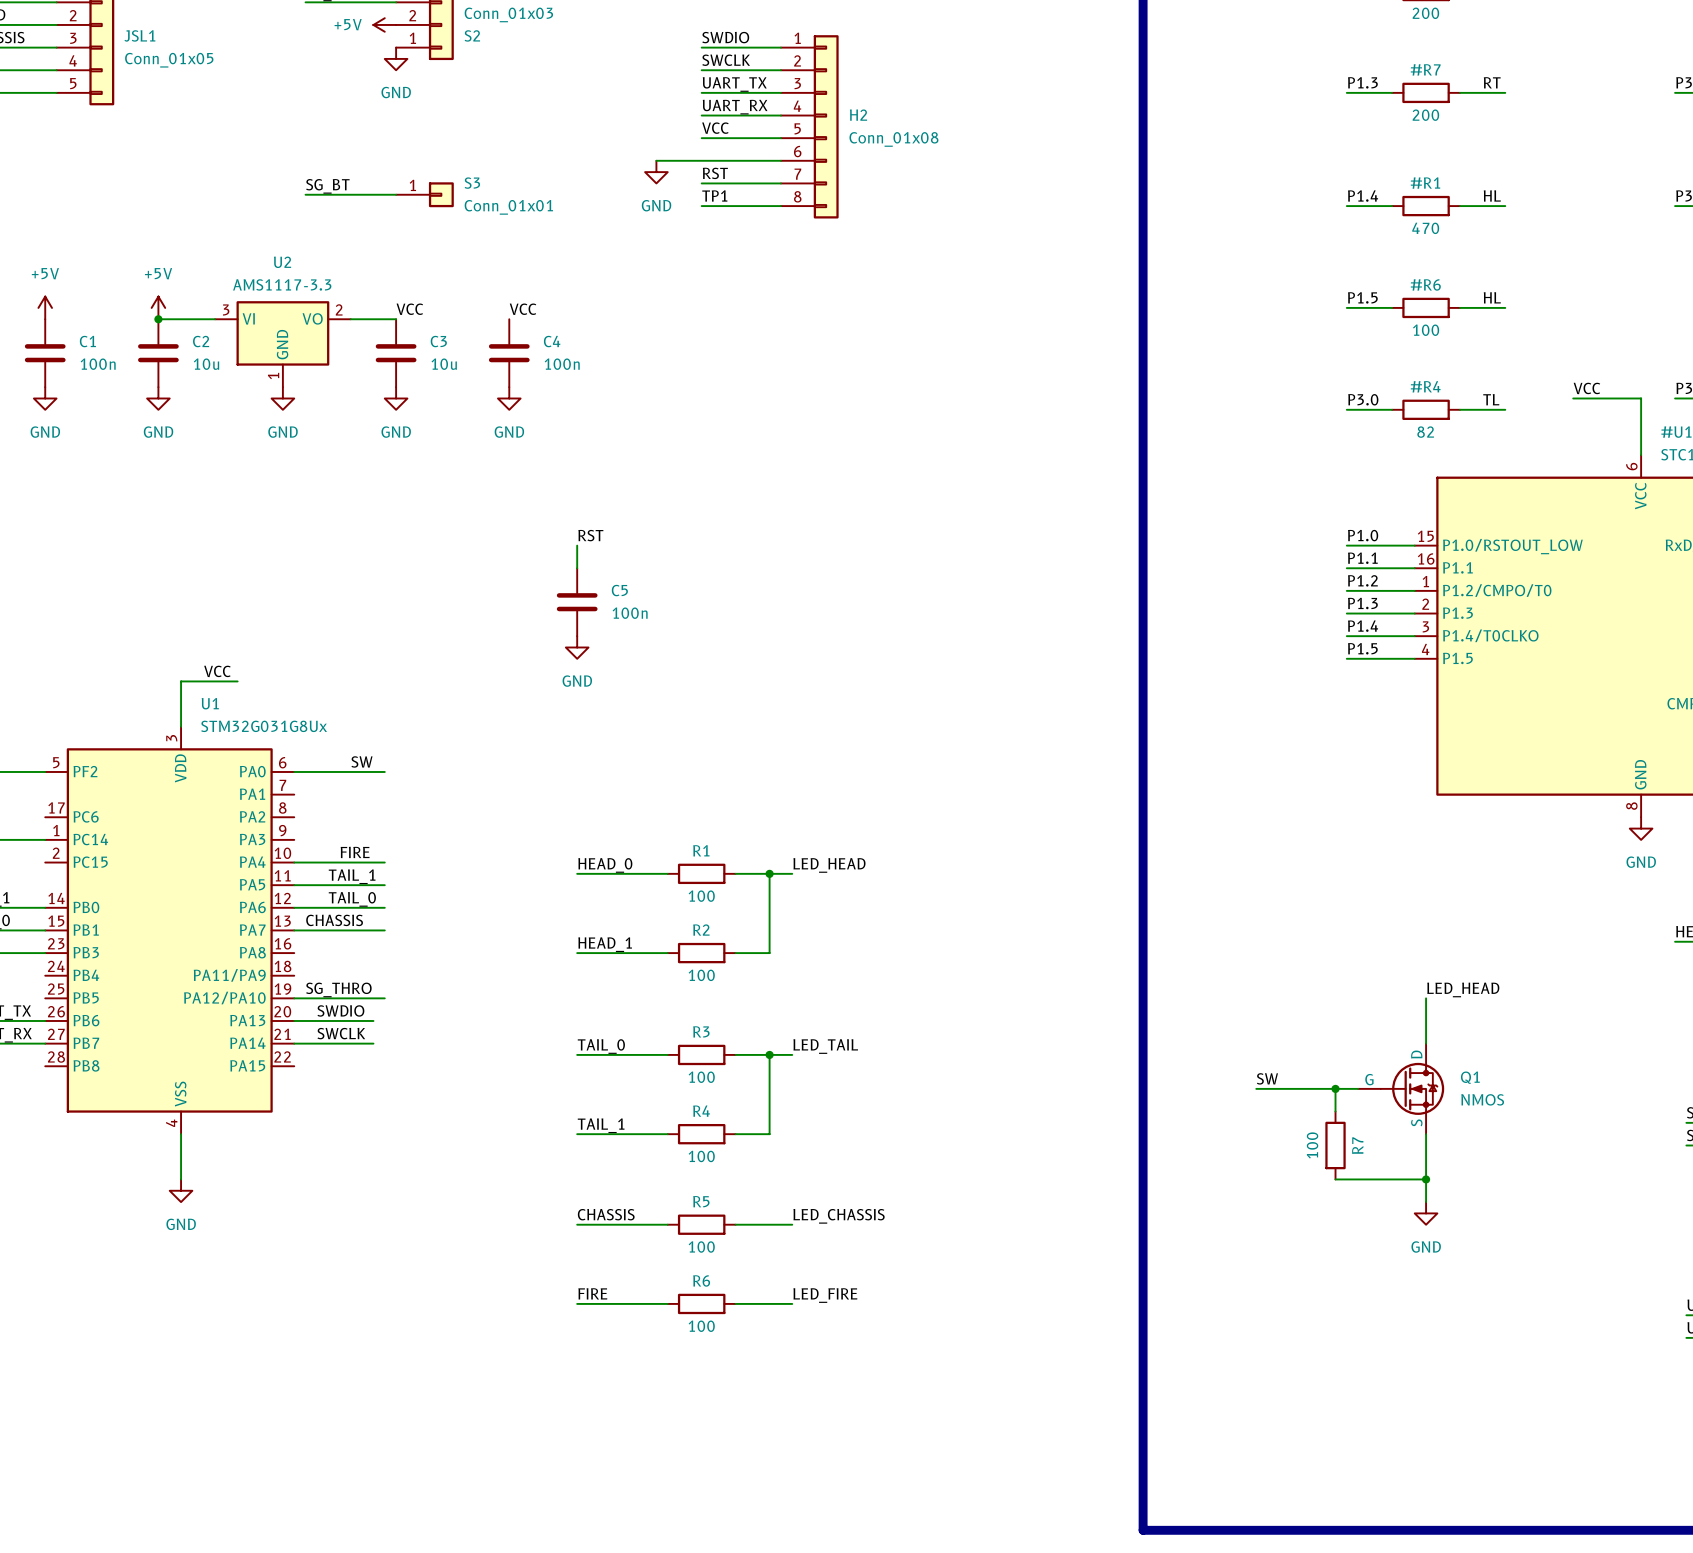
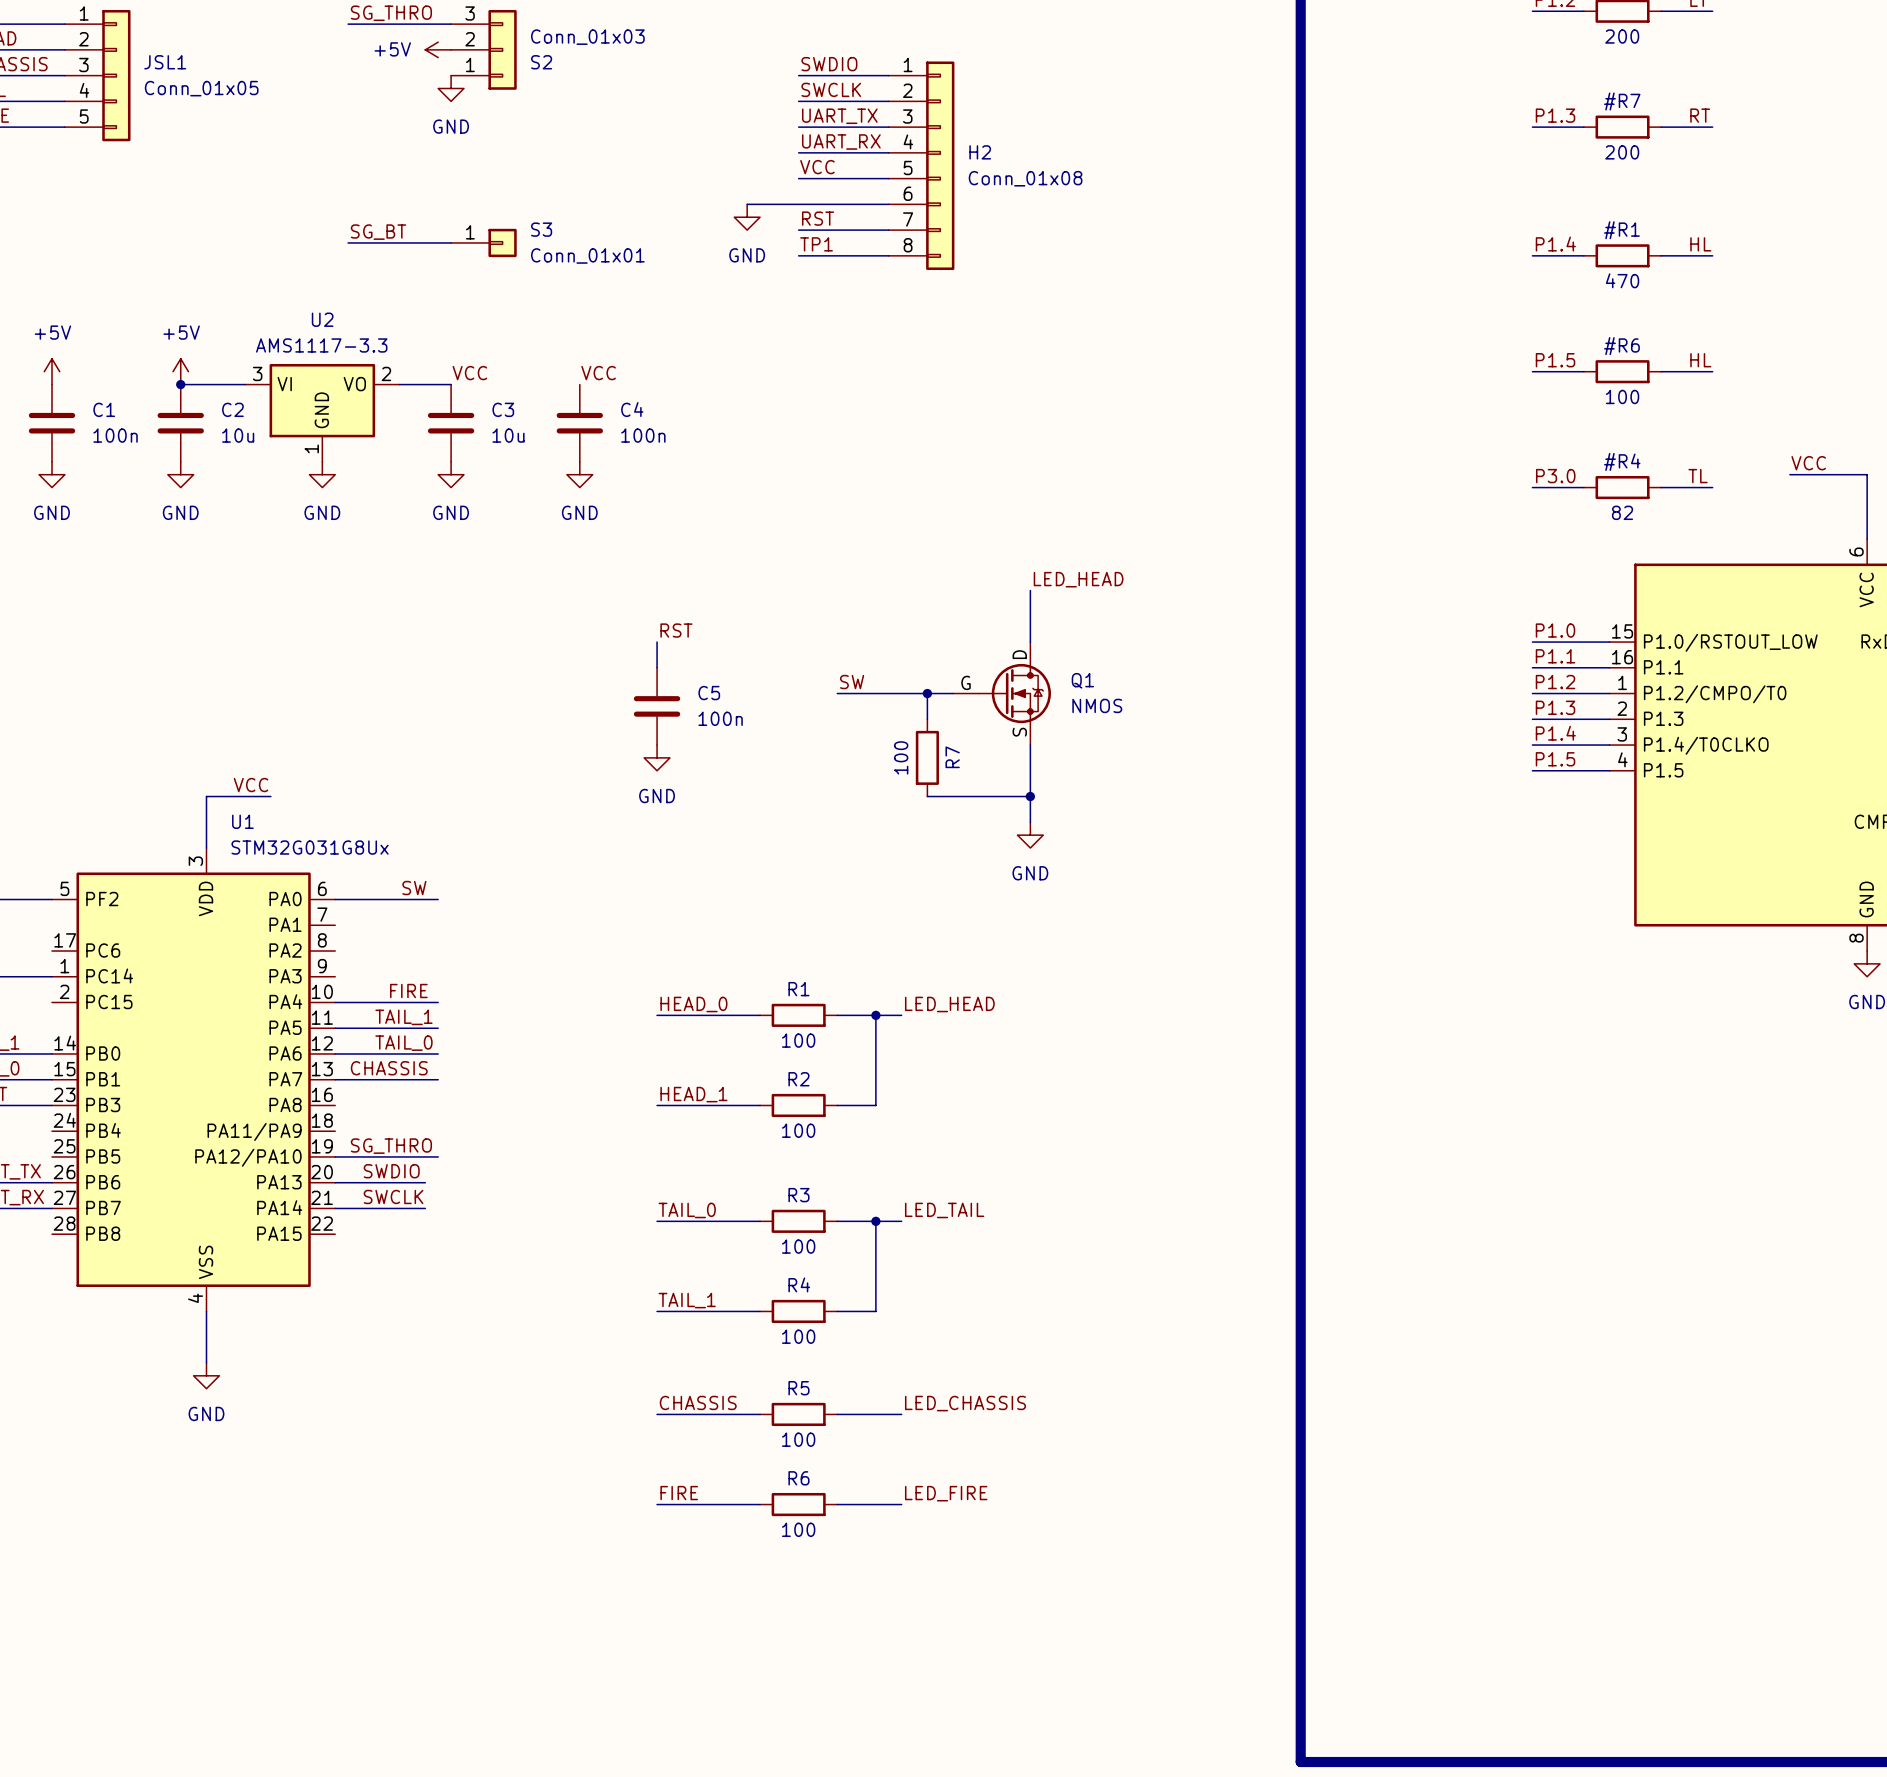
label: none -> LED_HEAD (1078, 579)
wire: none -> (1030, 590) (1030, 642)
label: none -> SW (852, 682)
wire: none -> (837, 693) (953, 693)
wire: none -> (927, 693) (927, 719)
junction: none -> (927, 693)
wire: none -> (1030, 745) (1030, 822)
wire: none -> (927, 796) (1030, 796)
junction: none -> (1030, 796)
power symbol: none -> GND (1030, 835)
label: LED_HEAD (1463, 989) -> none
wire: (1426, 998) (1426, 1043) -> none
label: SW (1267, 1078) -> none
wire: (1256, 1088) (1358, 1088) -> none
wire: (1335, 1088) (1335, 1111) -> none
junction: (1335, 1088) -> none
Q1 position: (1401, 1088) -> (1002, 693)
wire: (1426, 1134) (1426, 1202) -> none
R7 position: (1335, 1145) -> (927, 757)
wire: (1335, 1179) (1426, 1179) -> none
junction: (1426, 1179) -> none
power symbol: GND (1426, 1213) -> none

